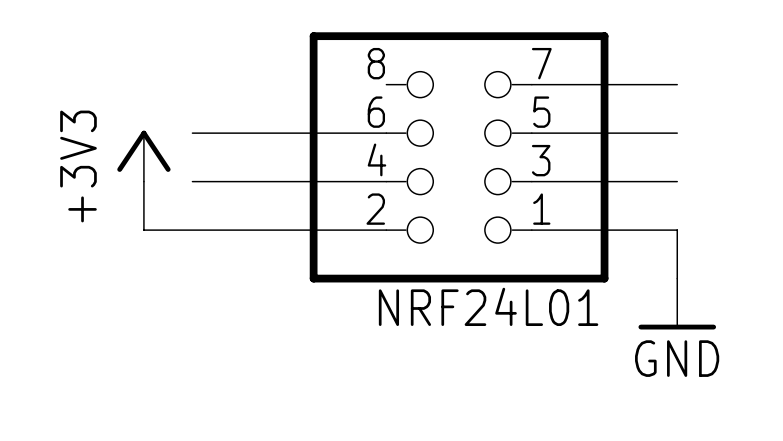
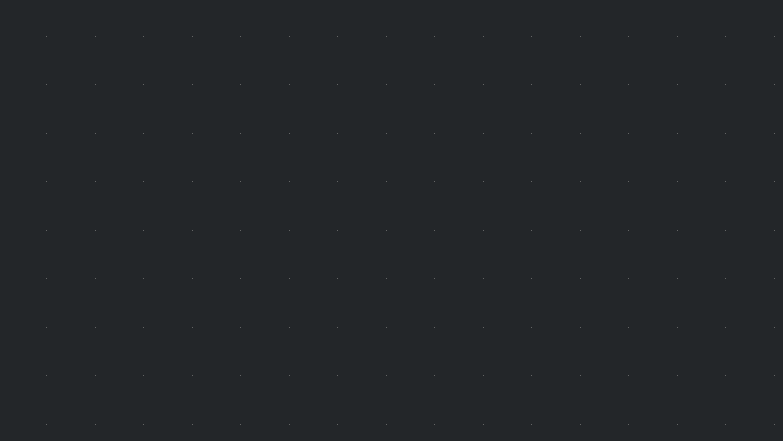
wire: (531, 84) (677, 84) -> none
wire: (192, 133) (386, 133) -> none
wire: (531, 133) (677, 133) -> none
power symbol: +3V3 (143, 156) -> none
NRF24L01: (459, 157) -> none
wire: (143, 181) (143, 230) (386, 230) -> none
wire: (192, 181) (386, 181) -> none
wire: (531, 181) (677, 181) -> none
wire: (531, 230) (677, 230) (677, 278) -> none
power symbol: GND (677, 304) -> none

